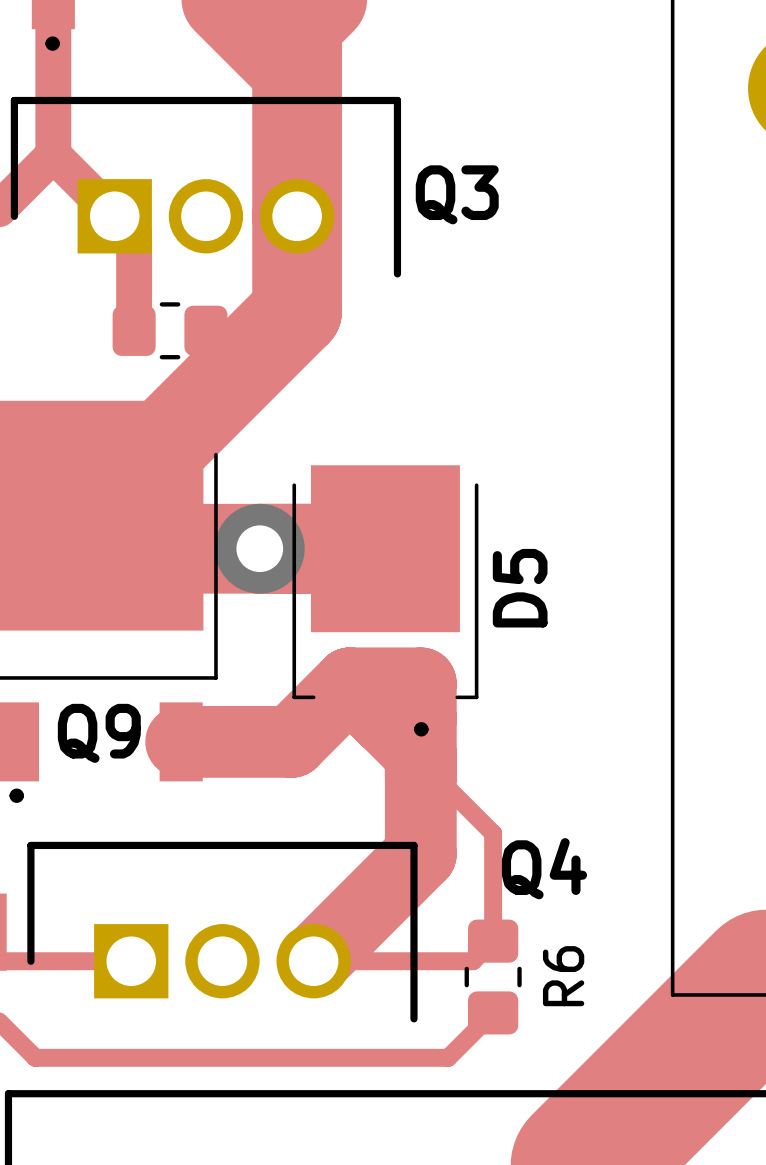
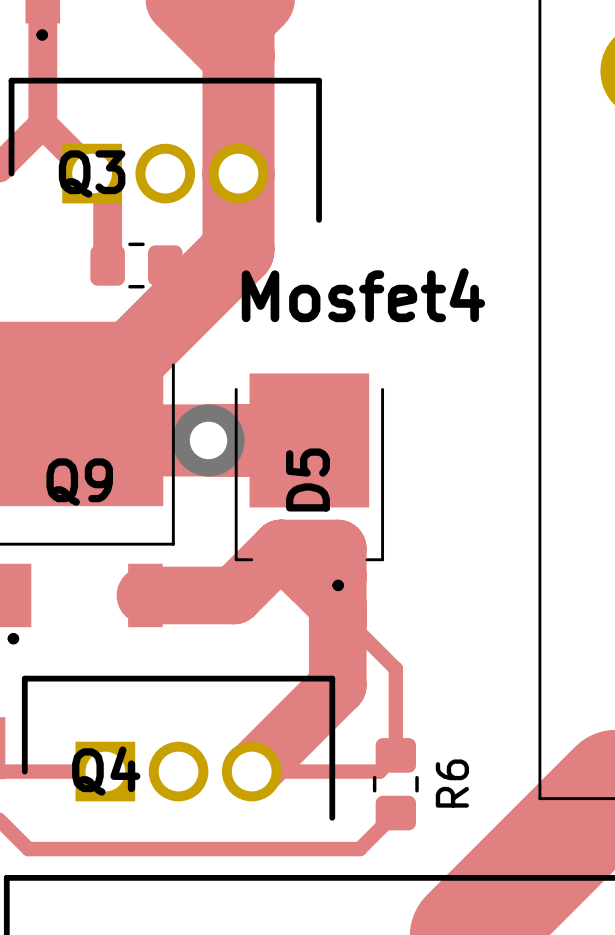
Q3 name position: Q3 (457, 194) -> Q3 (92, 173)
text: none -> Mosfet4 (363, 295)
D5 name position: D5 (520, 588) -> D5 (308, 479)
Q9 name position: Q9 (99, 733) -> Q9 (79, 482)
Q4 name position: Q4 (544, 868) -> Q4 (106, 771)

